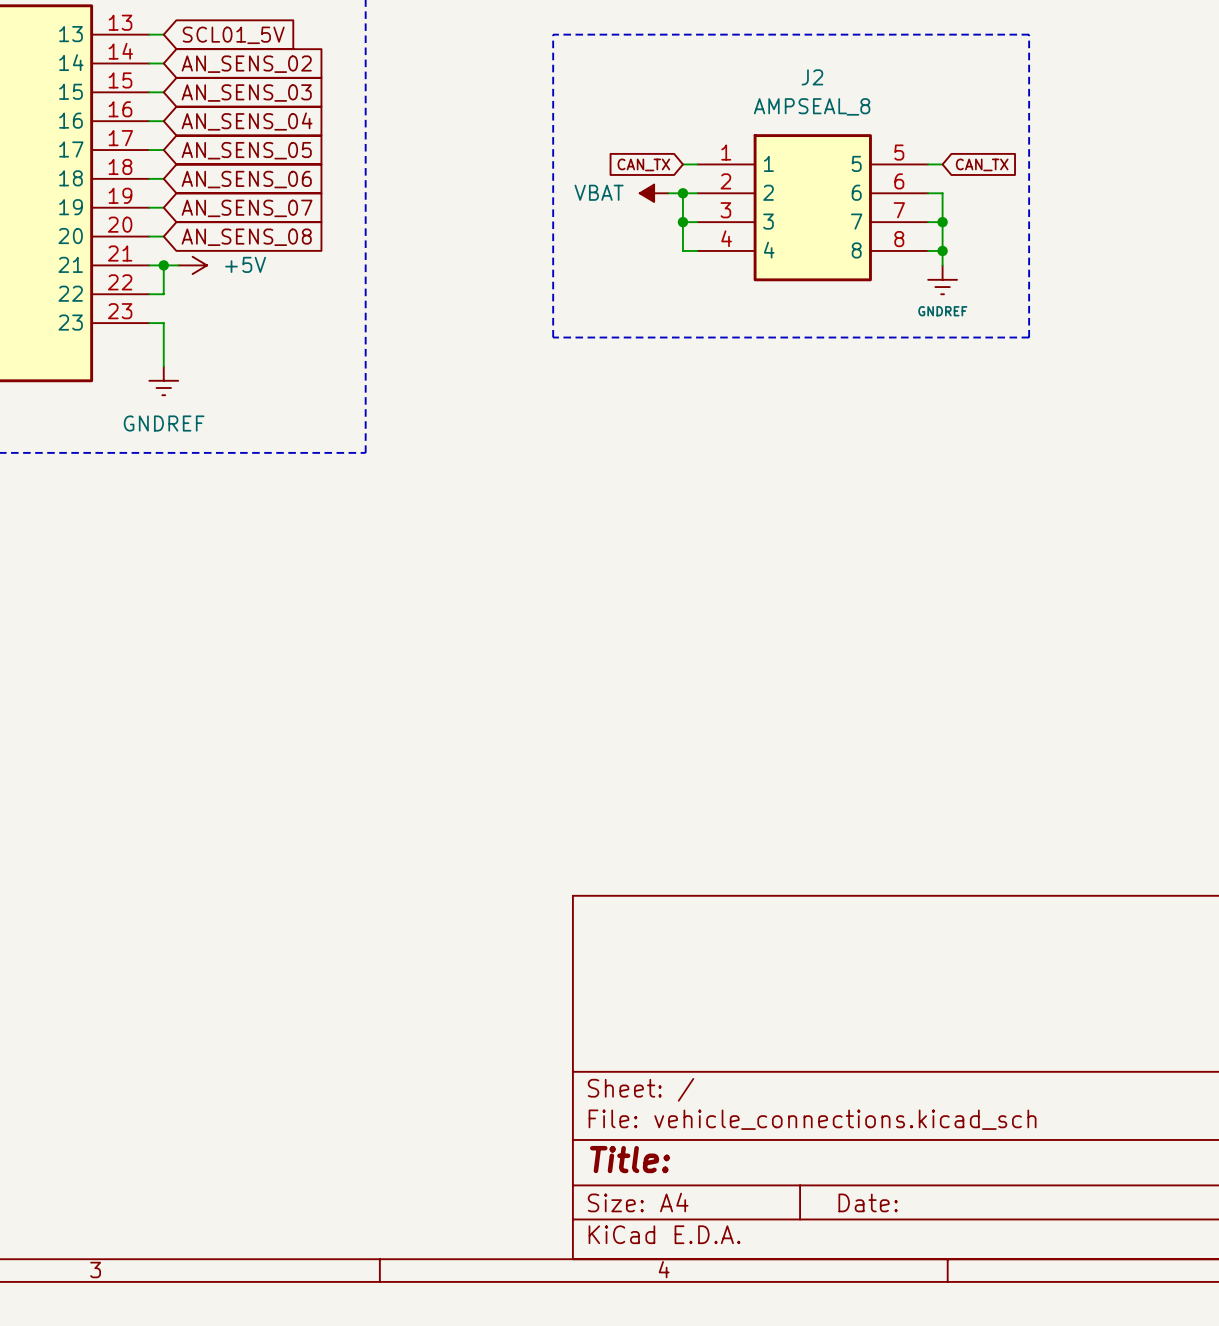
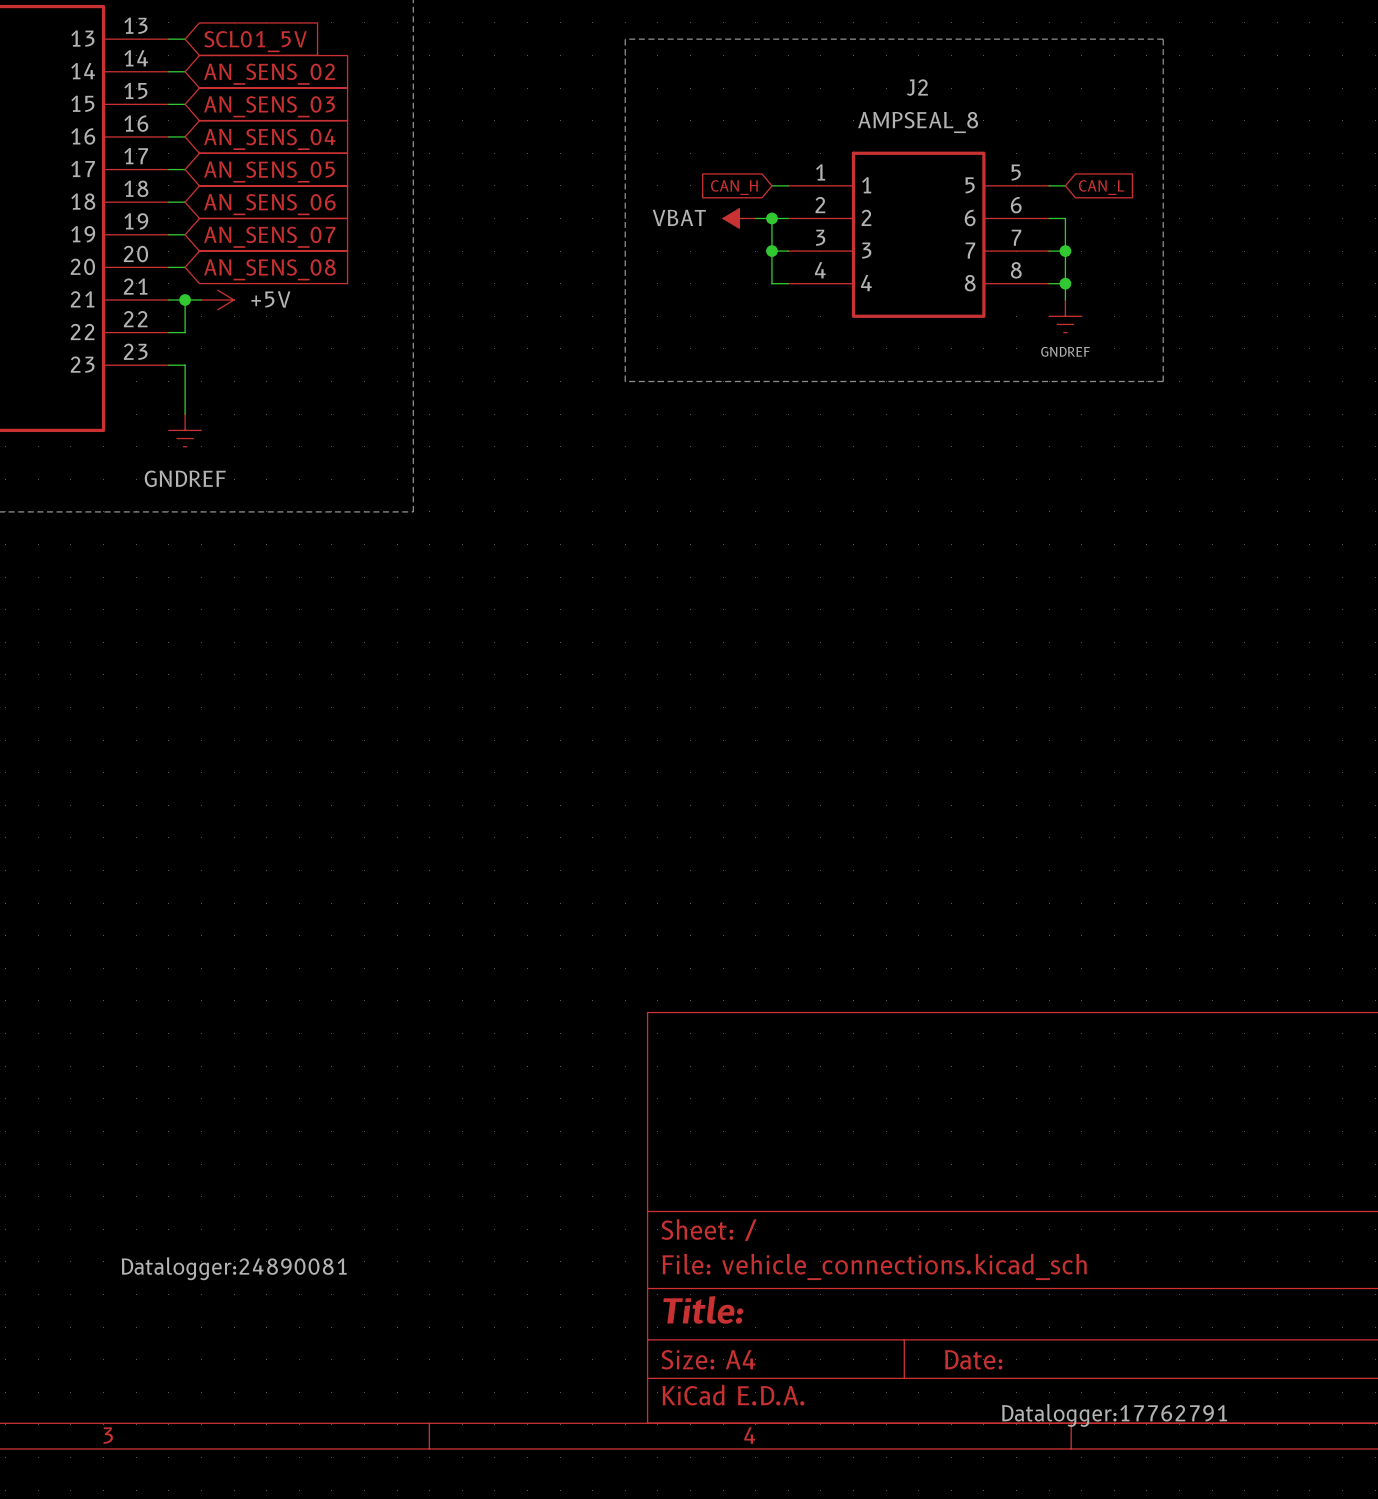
global label: CAN_TX (643, 164) -> CAN_H (734, 187)
global label: CAN_TX (982, 164) -> CAN_L (1101, 187)
part text: none -> Datalogger:24890081 (234, 1268)
J2 text: none -> Datalogger:17762791 (1114, 1415)

